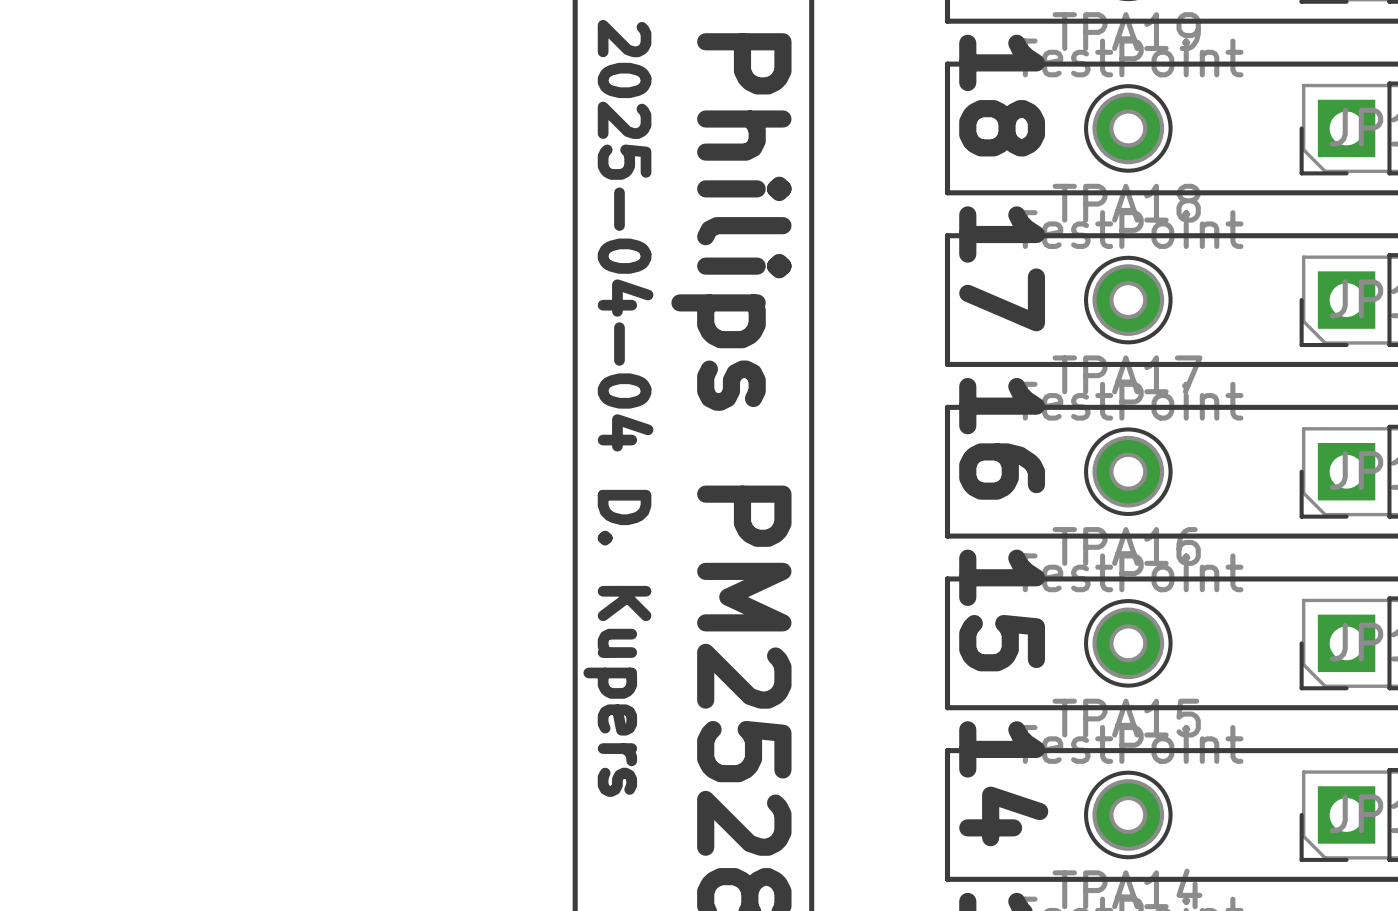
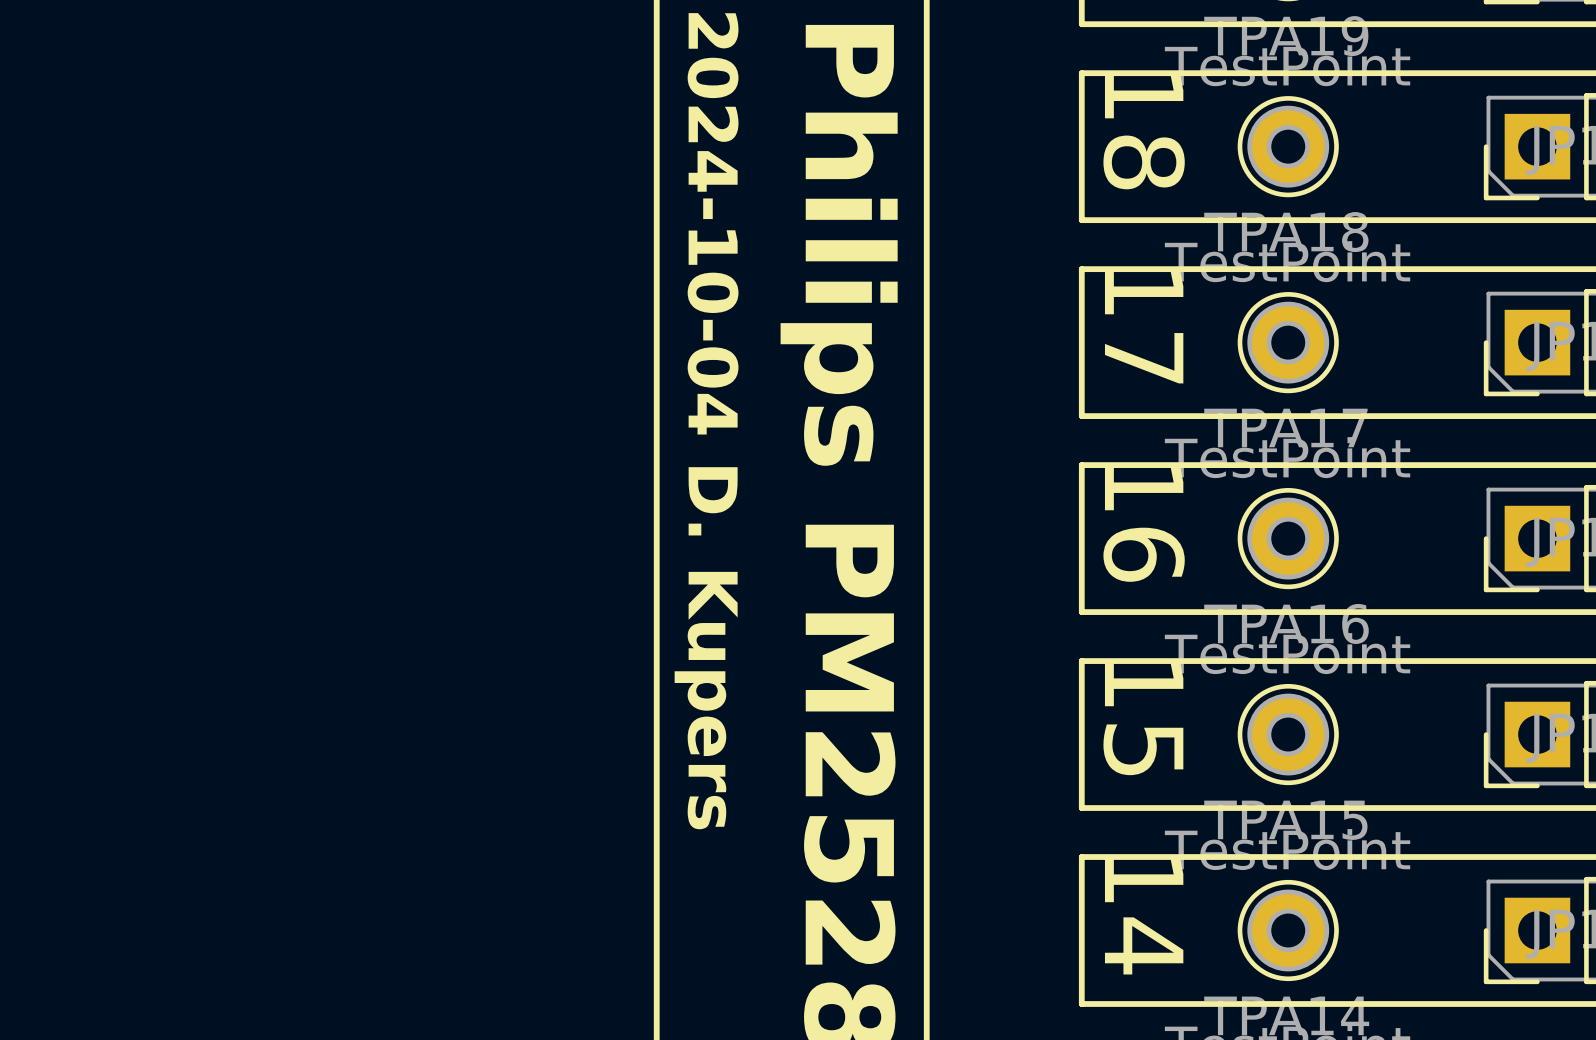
text: 2025-04-04 D. Kupers (618, 408) -> 2024-10-04 D. Kupers (706, 421)

